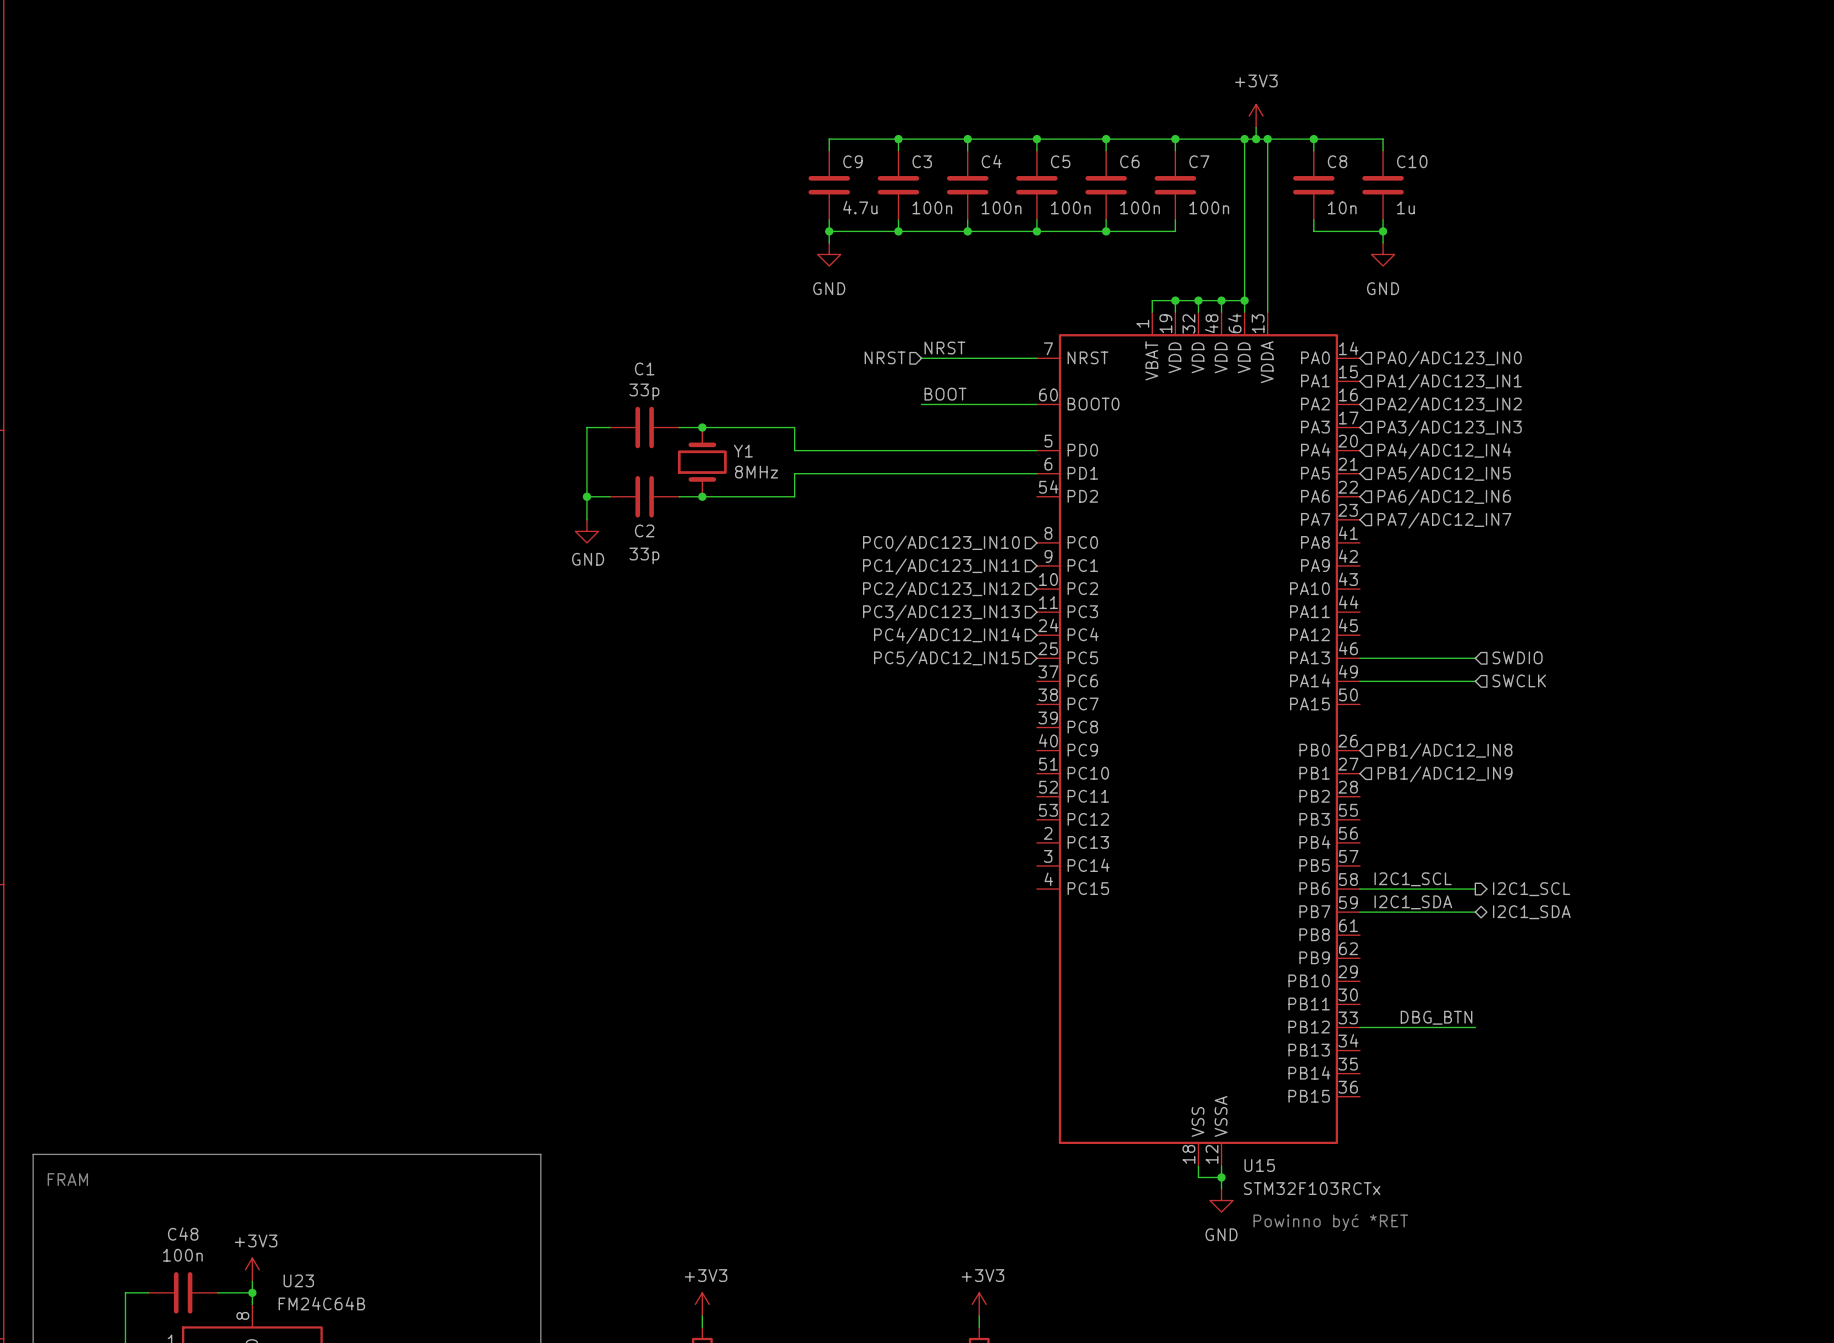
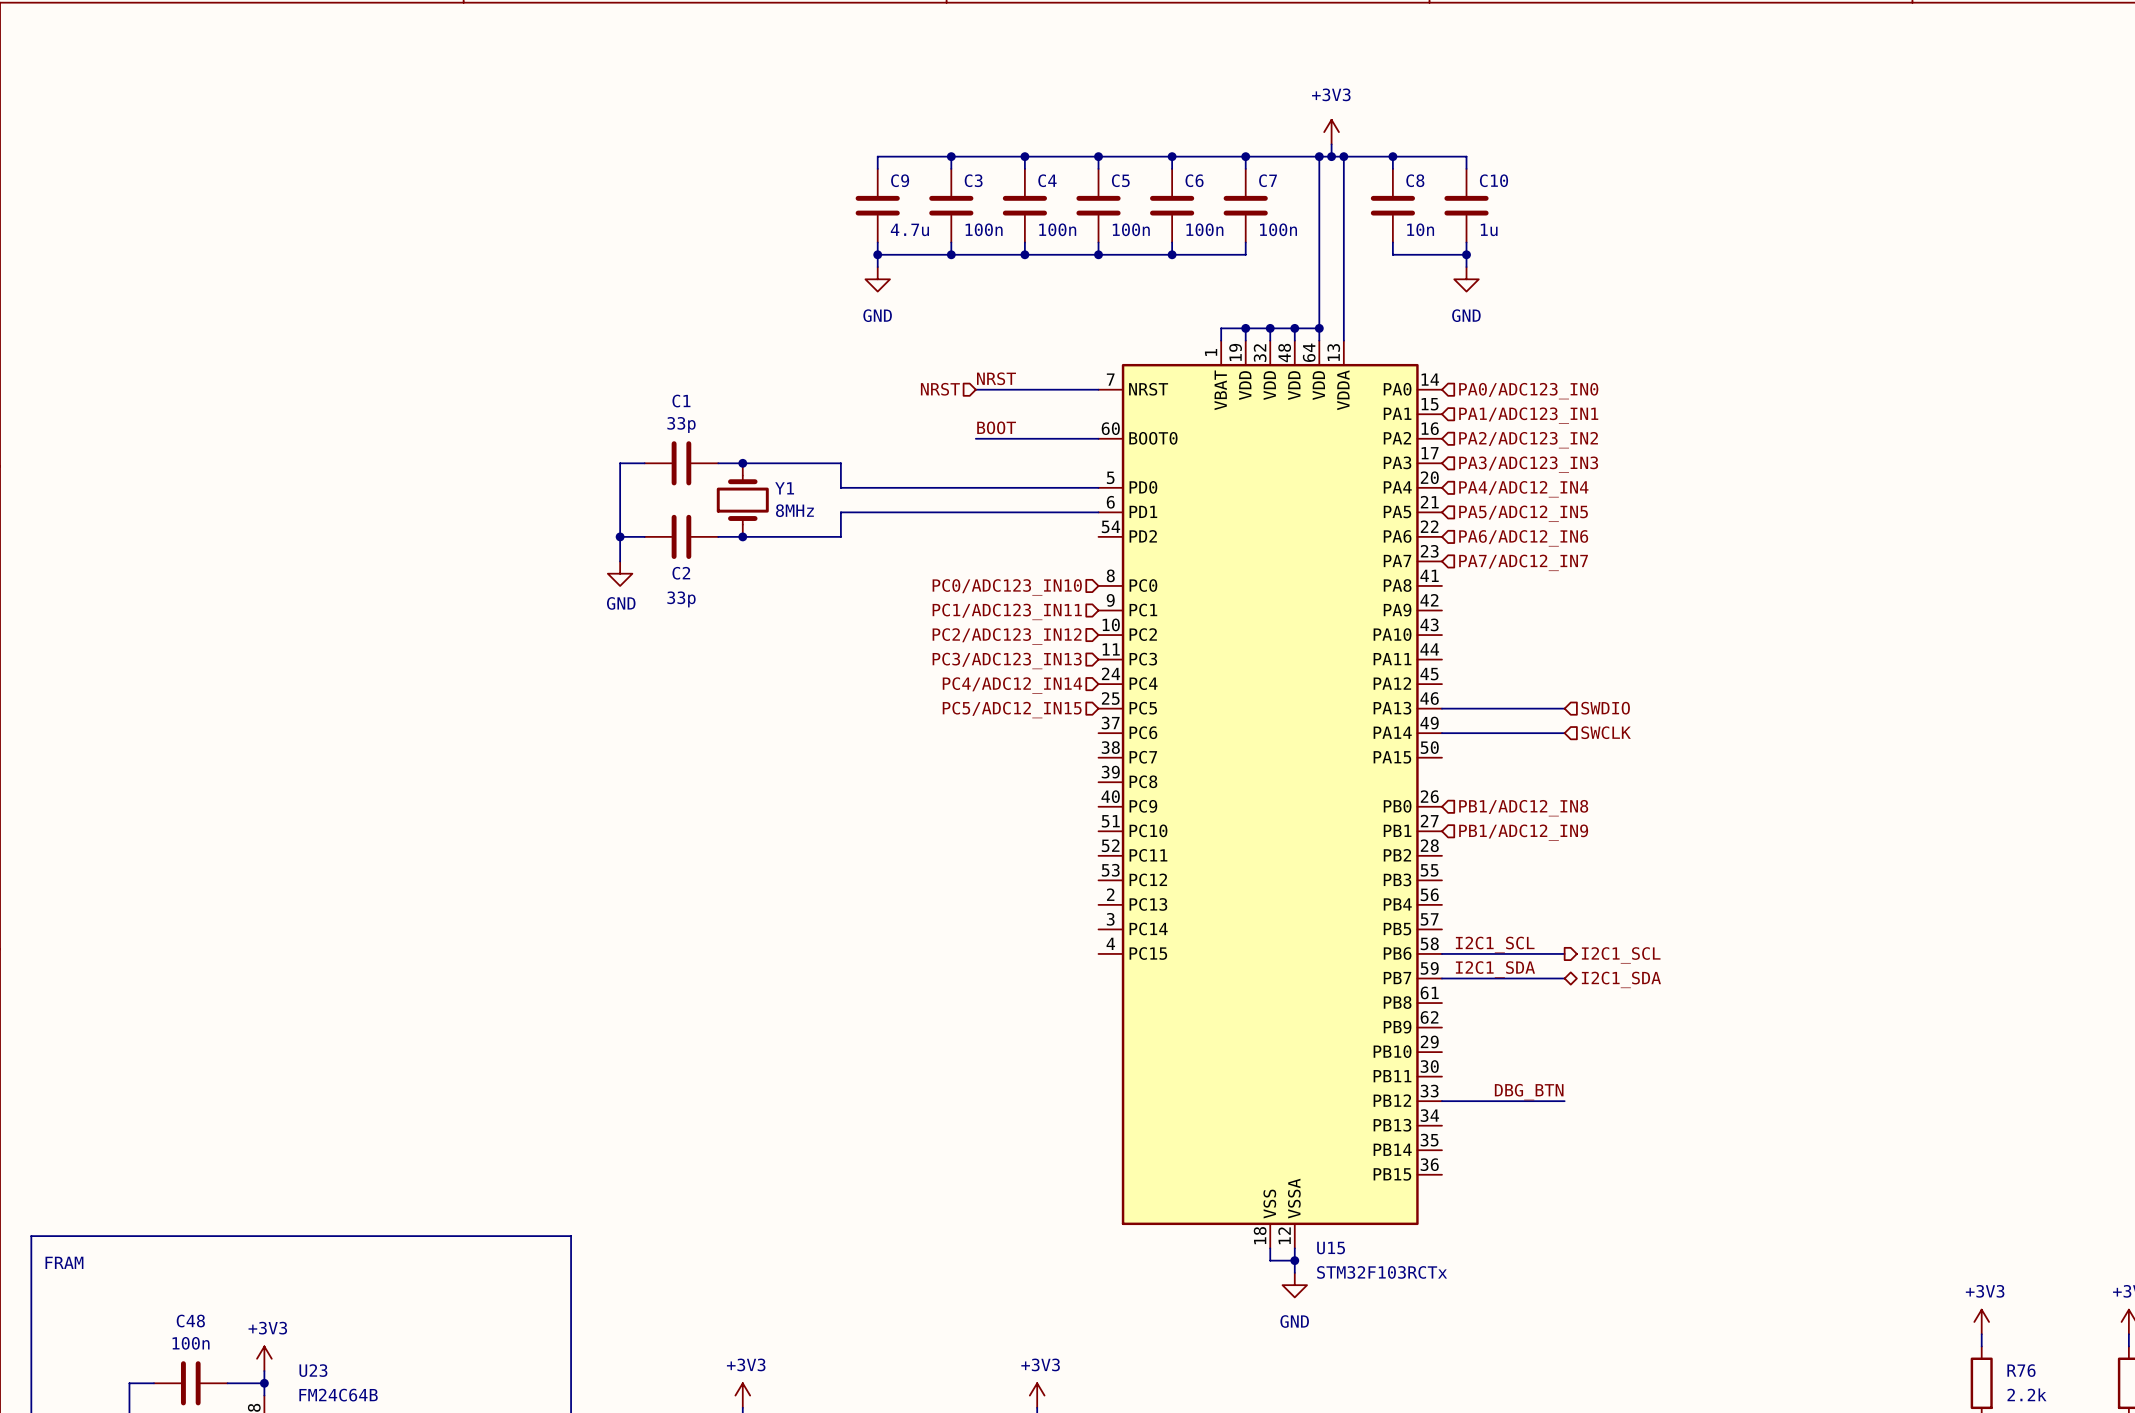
text: Powinno być *RET (1330, 1222) -> none

